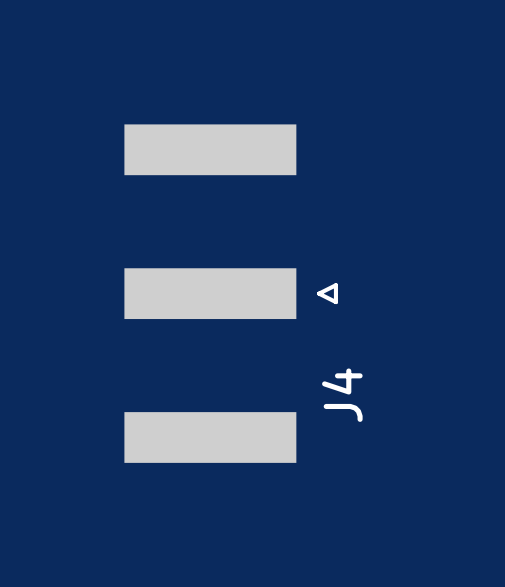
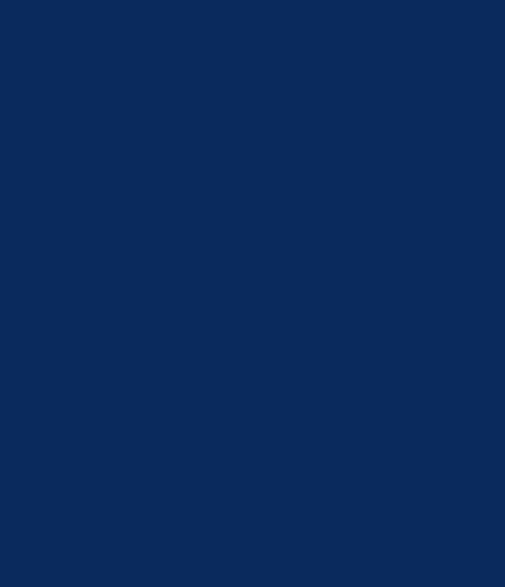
J4: (231, 293) -> none

